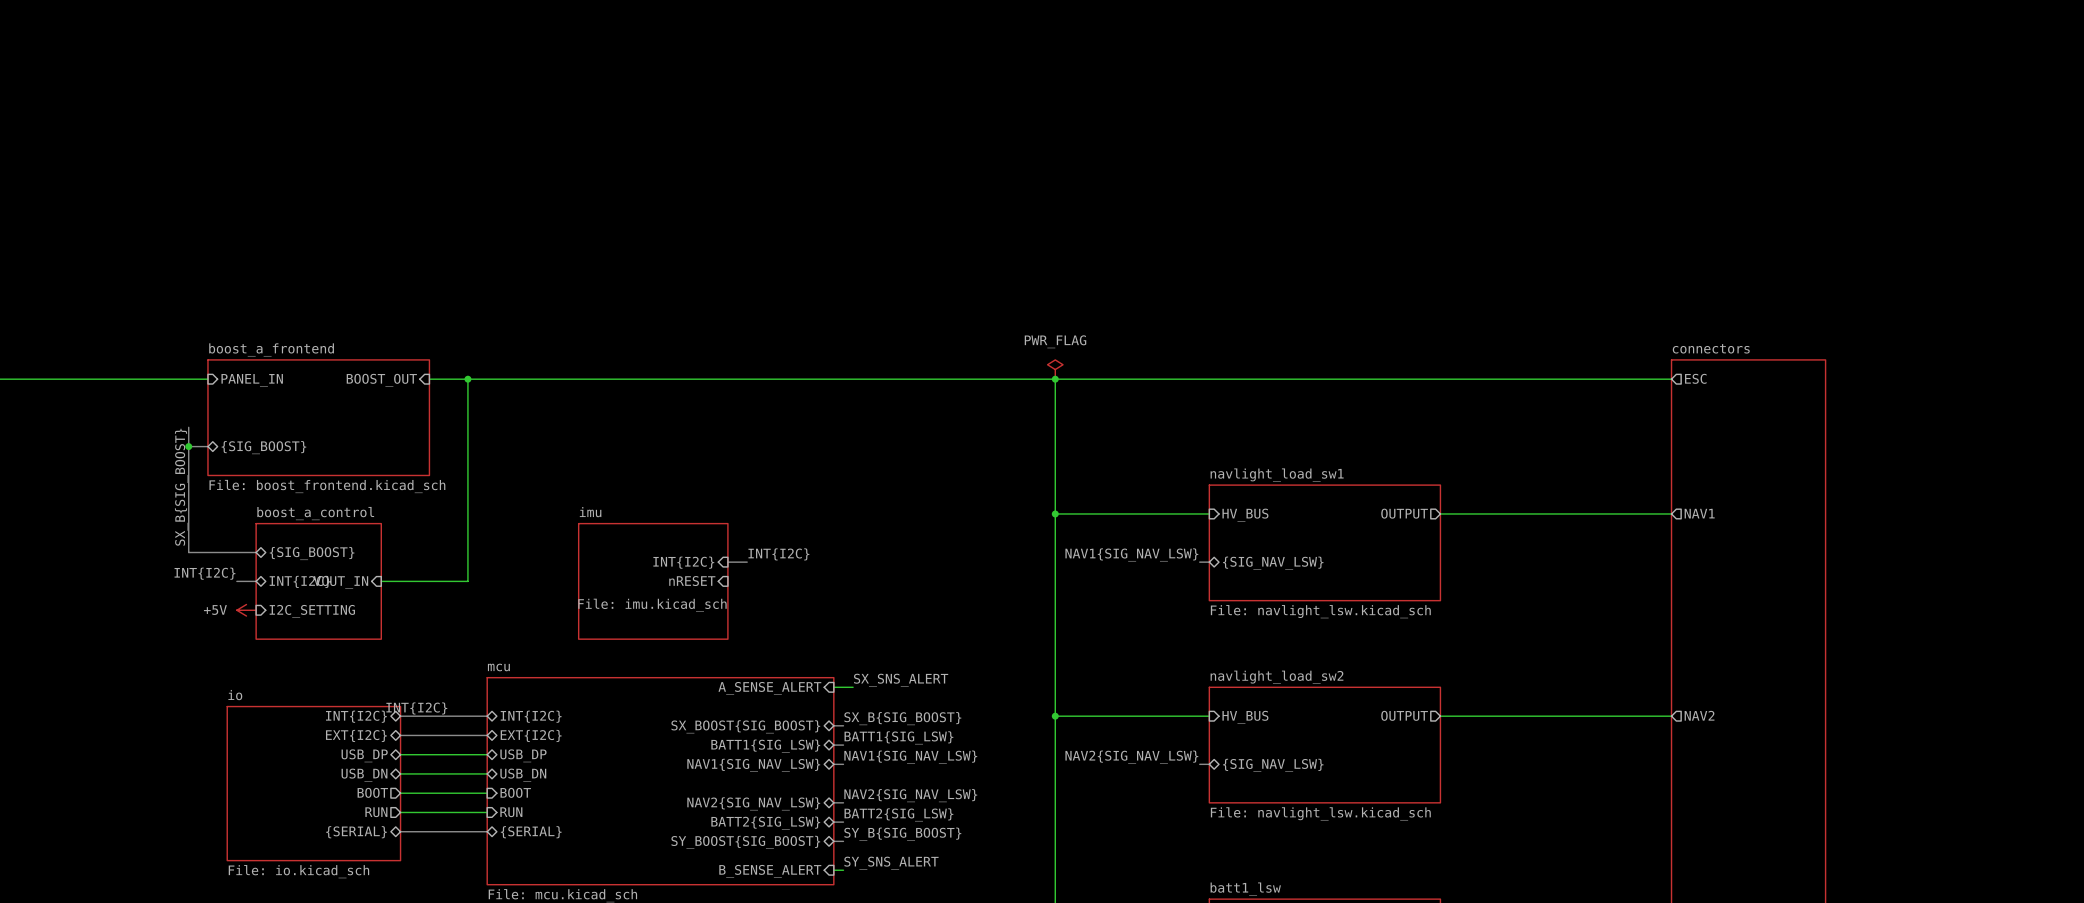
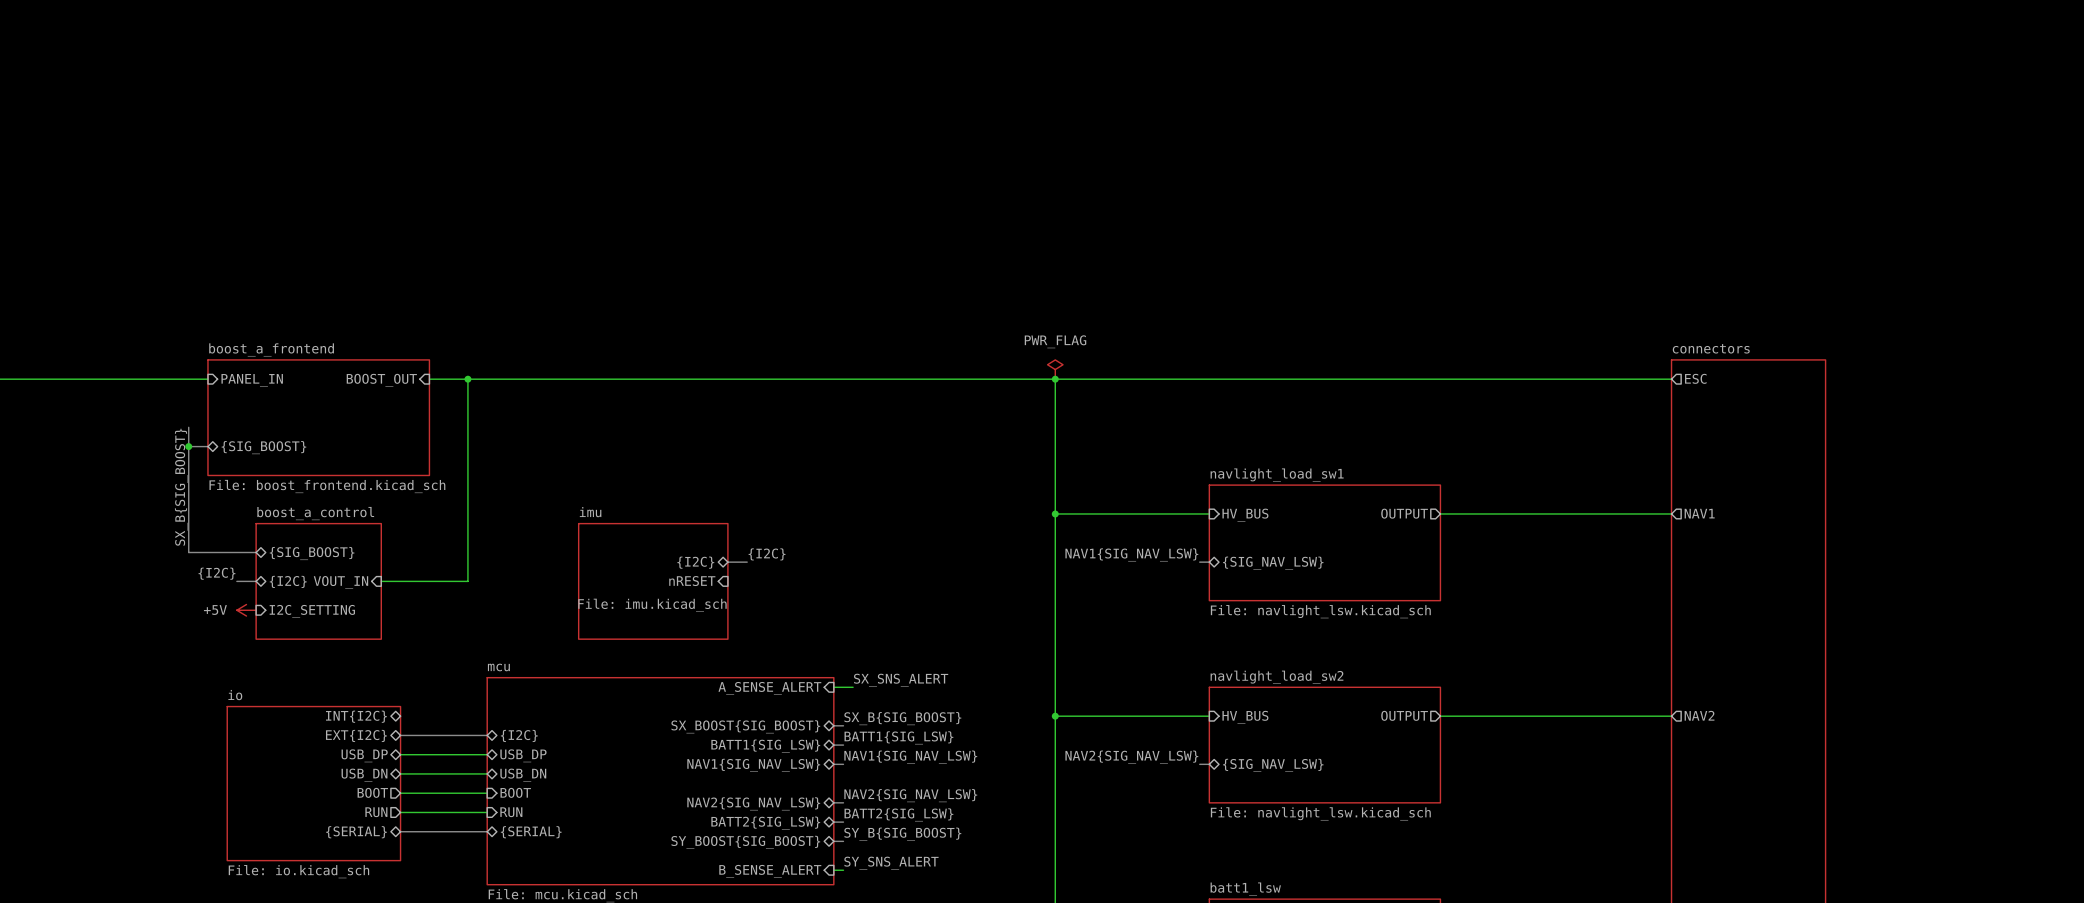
label: INT{I2C} (778, 554) -> {I2C} (767, 554)
sheet pin shape: input (683, 562) -> bidirectional (695, 562)
sheet pin: INT{I2C} (683, 562) -> {I2C} (695, 562)
label: INT{I2C} (204, 573) -> {I2C} (216, 573)
sheet pin: INT{I2C} (300, 581) -> {I2C} (288, 581)
label: INT{I2C} (416, 708) -> none
bus: (400, 716) (487, 716) -> none
sheet pin: INT{I2C} (531, 716) -> none
sheet pin: EXT{I2C} (531, 735) -> {I2C} (519, 735)

